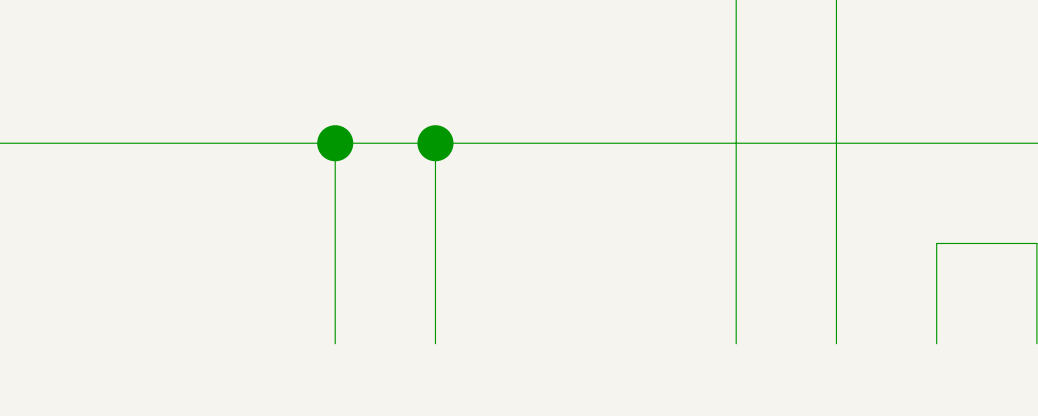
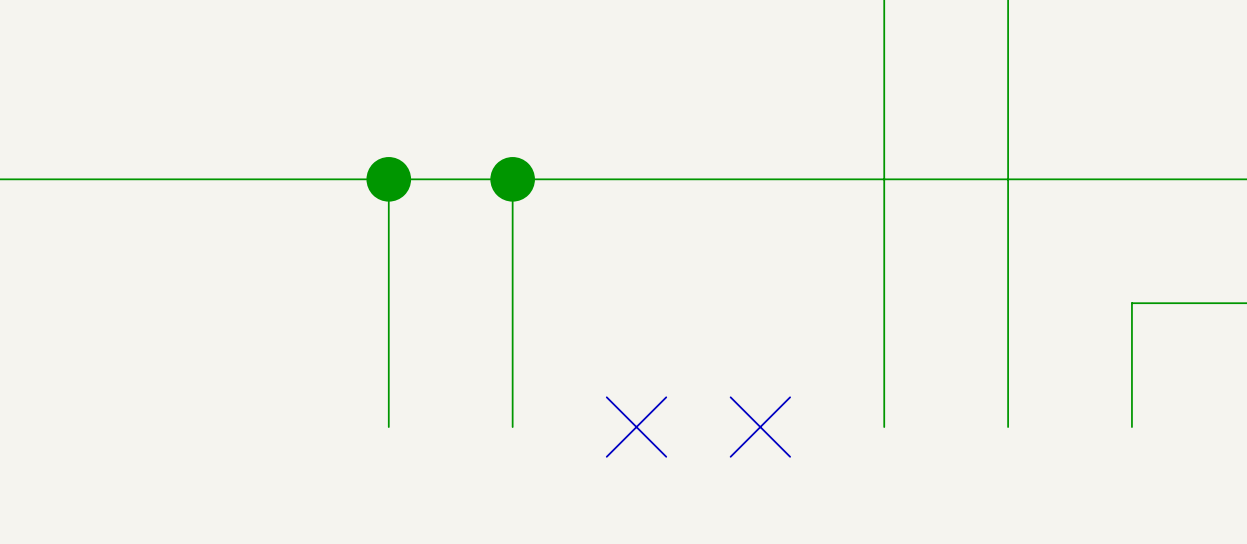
no-connect mark: none -> (636, 427)
no-connect mark: none -> (760, 427)

